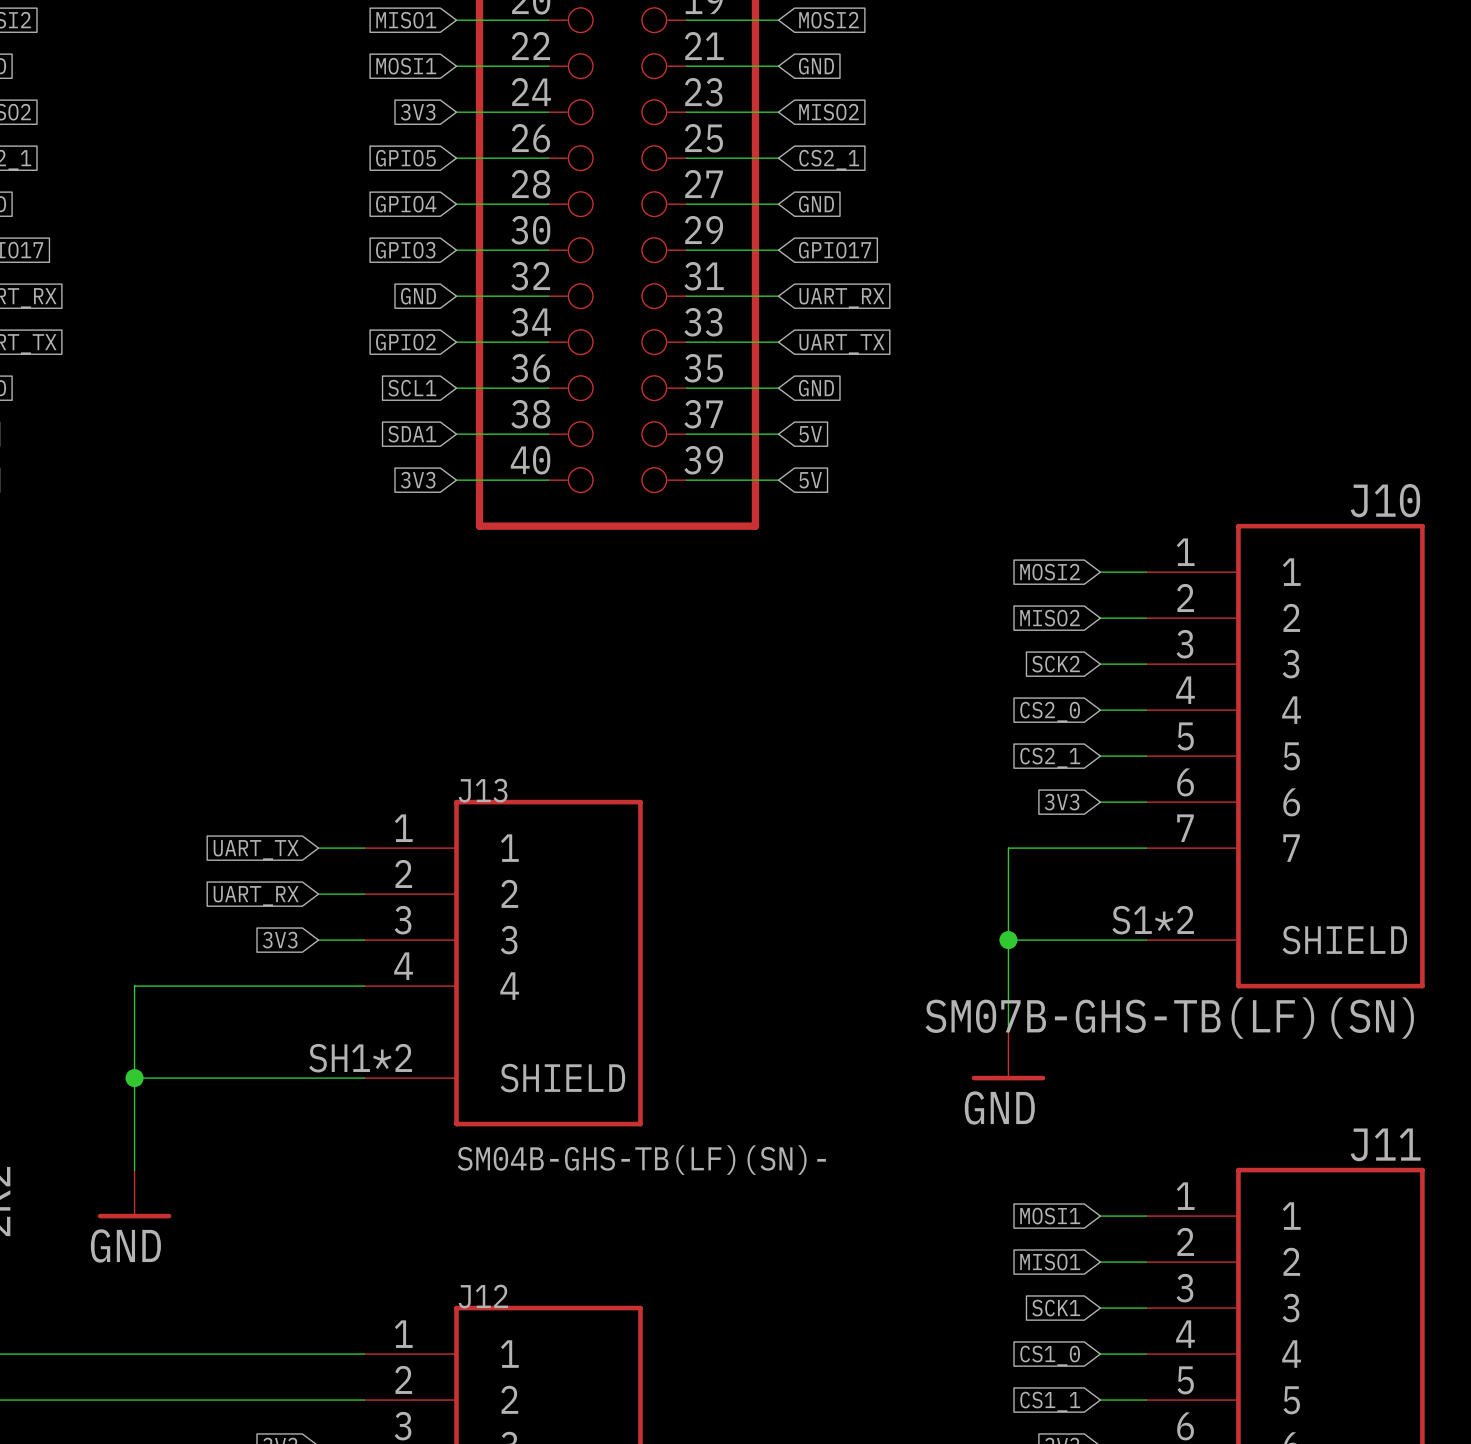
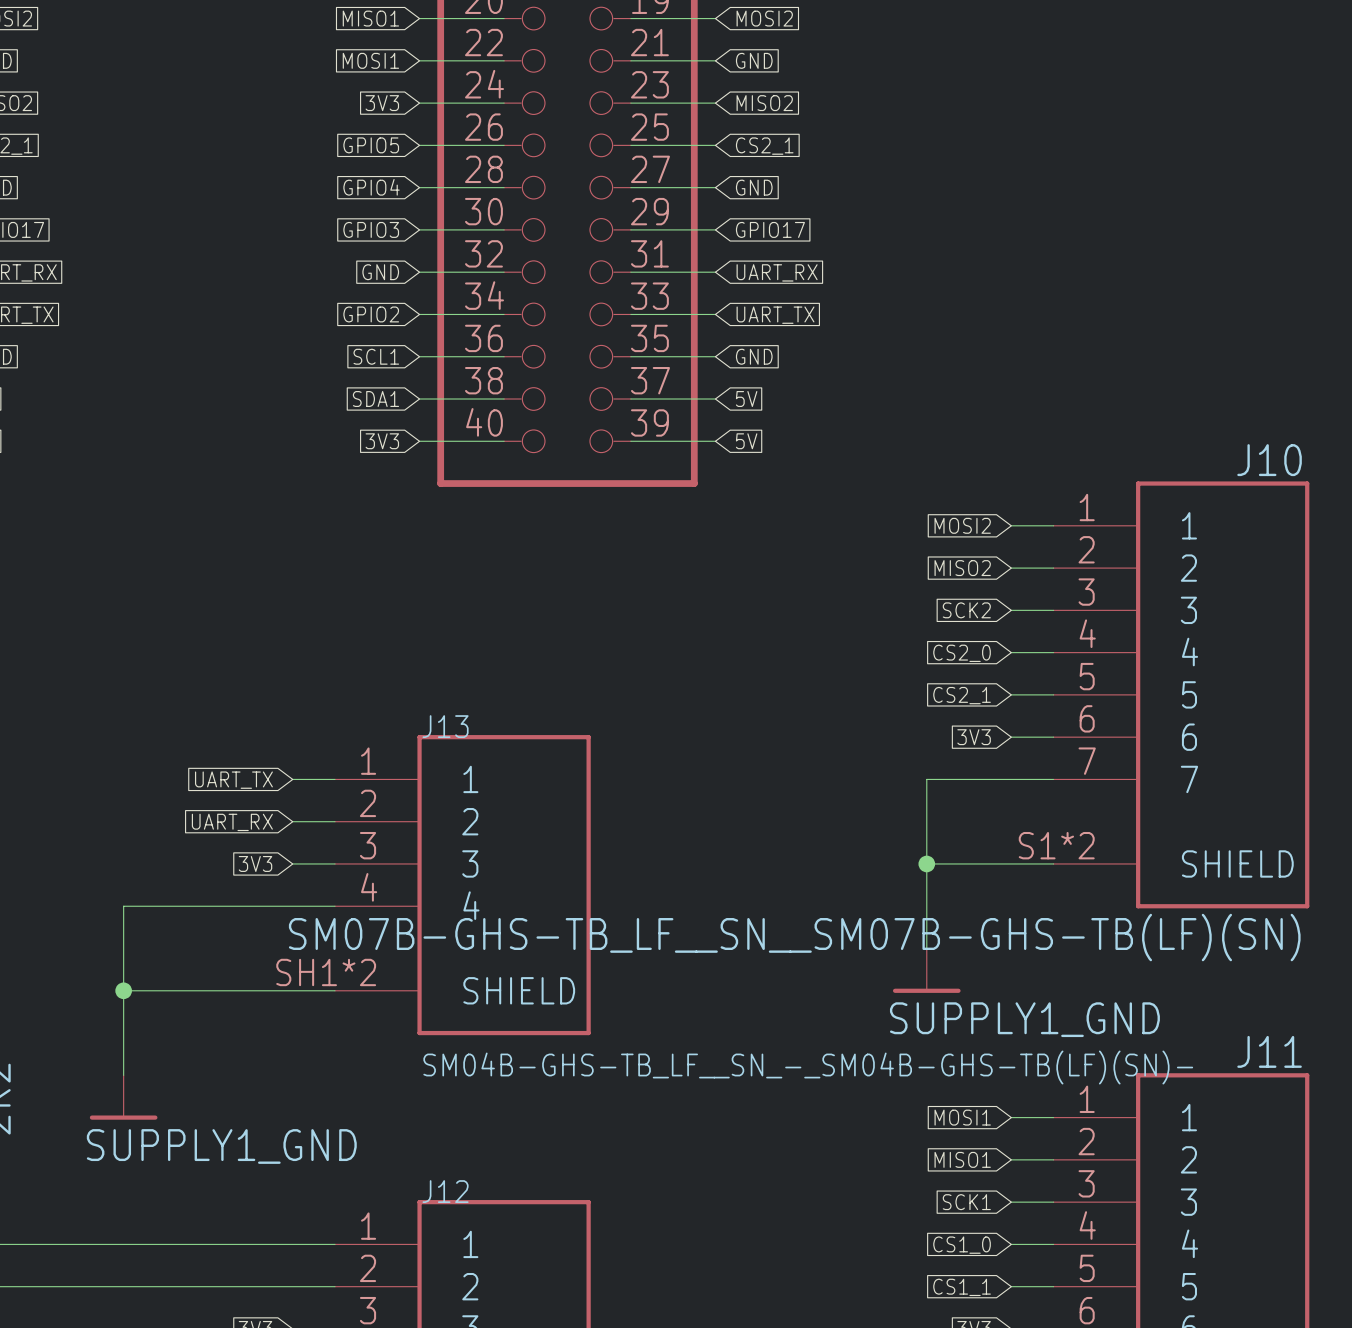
J10 value: SM07B-GHS-TB(LF)(SN) (1169, 1018) -> SM07B-GHS-TB_LF__SN__SM07B-GHS-TB(LF)(SN) (794, 937)
power symbol: GND (1008, 1056) -> SUPPLY1_GND (926, 970)
J13 value: SM04B-GHS-TB(LF)(SN)- (641, 1160) -> SM04B-GHS-TB_LF__SN_-_SM04B-GHS-TB(LF)(SN)- (808, 1067)
power symbol: GND (134, 1194) -> SUPPLY1_GND (123, 1097)

